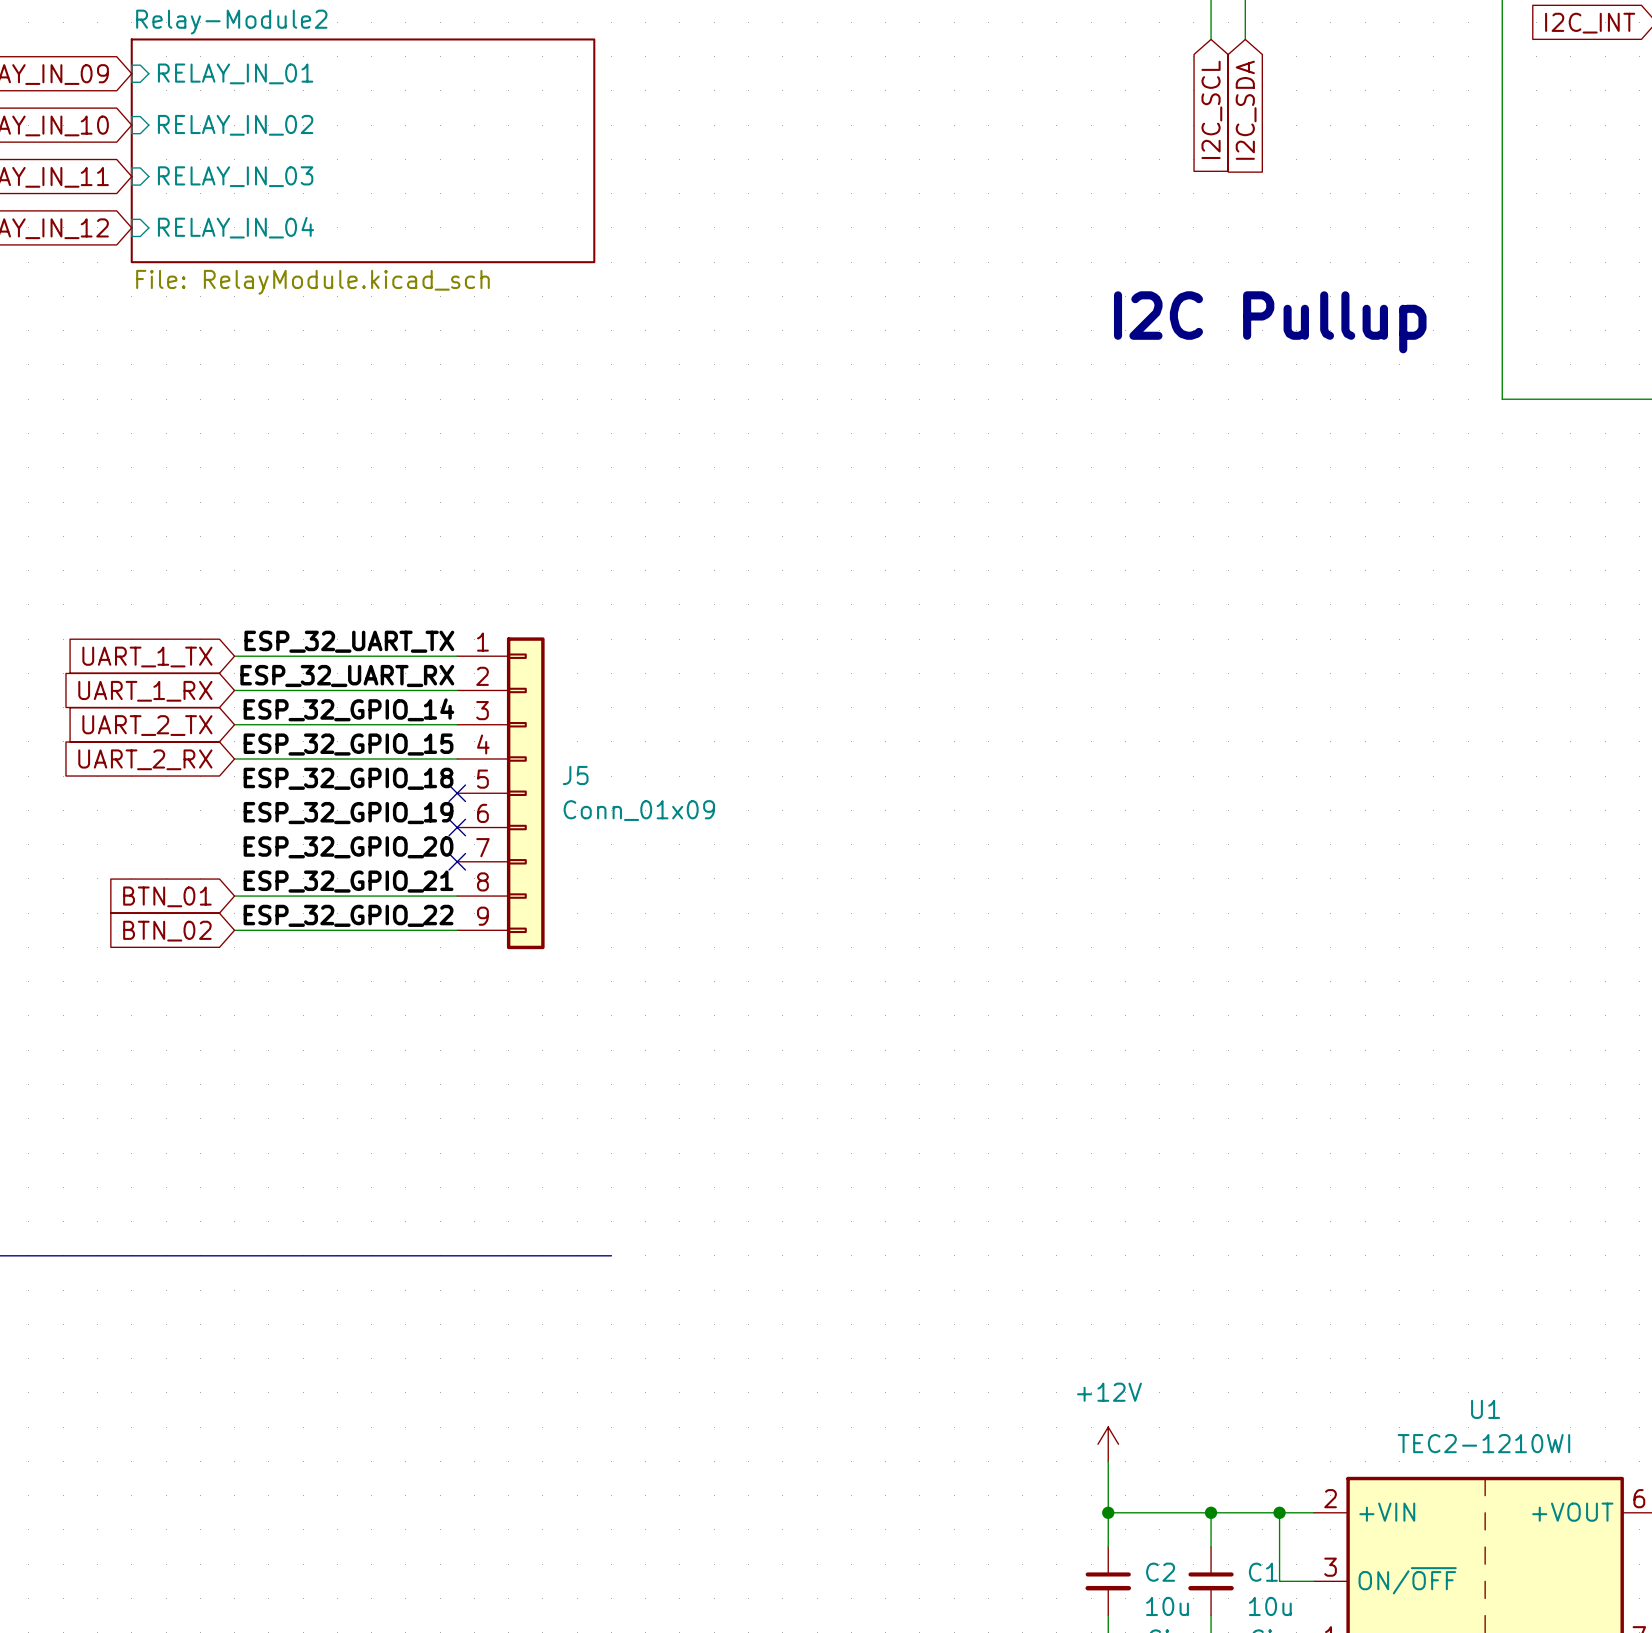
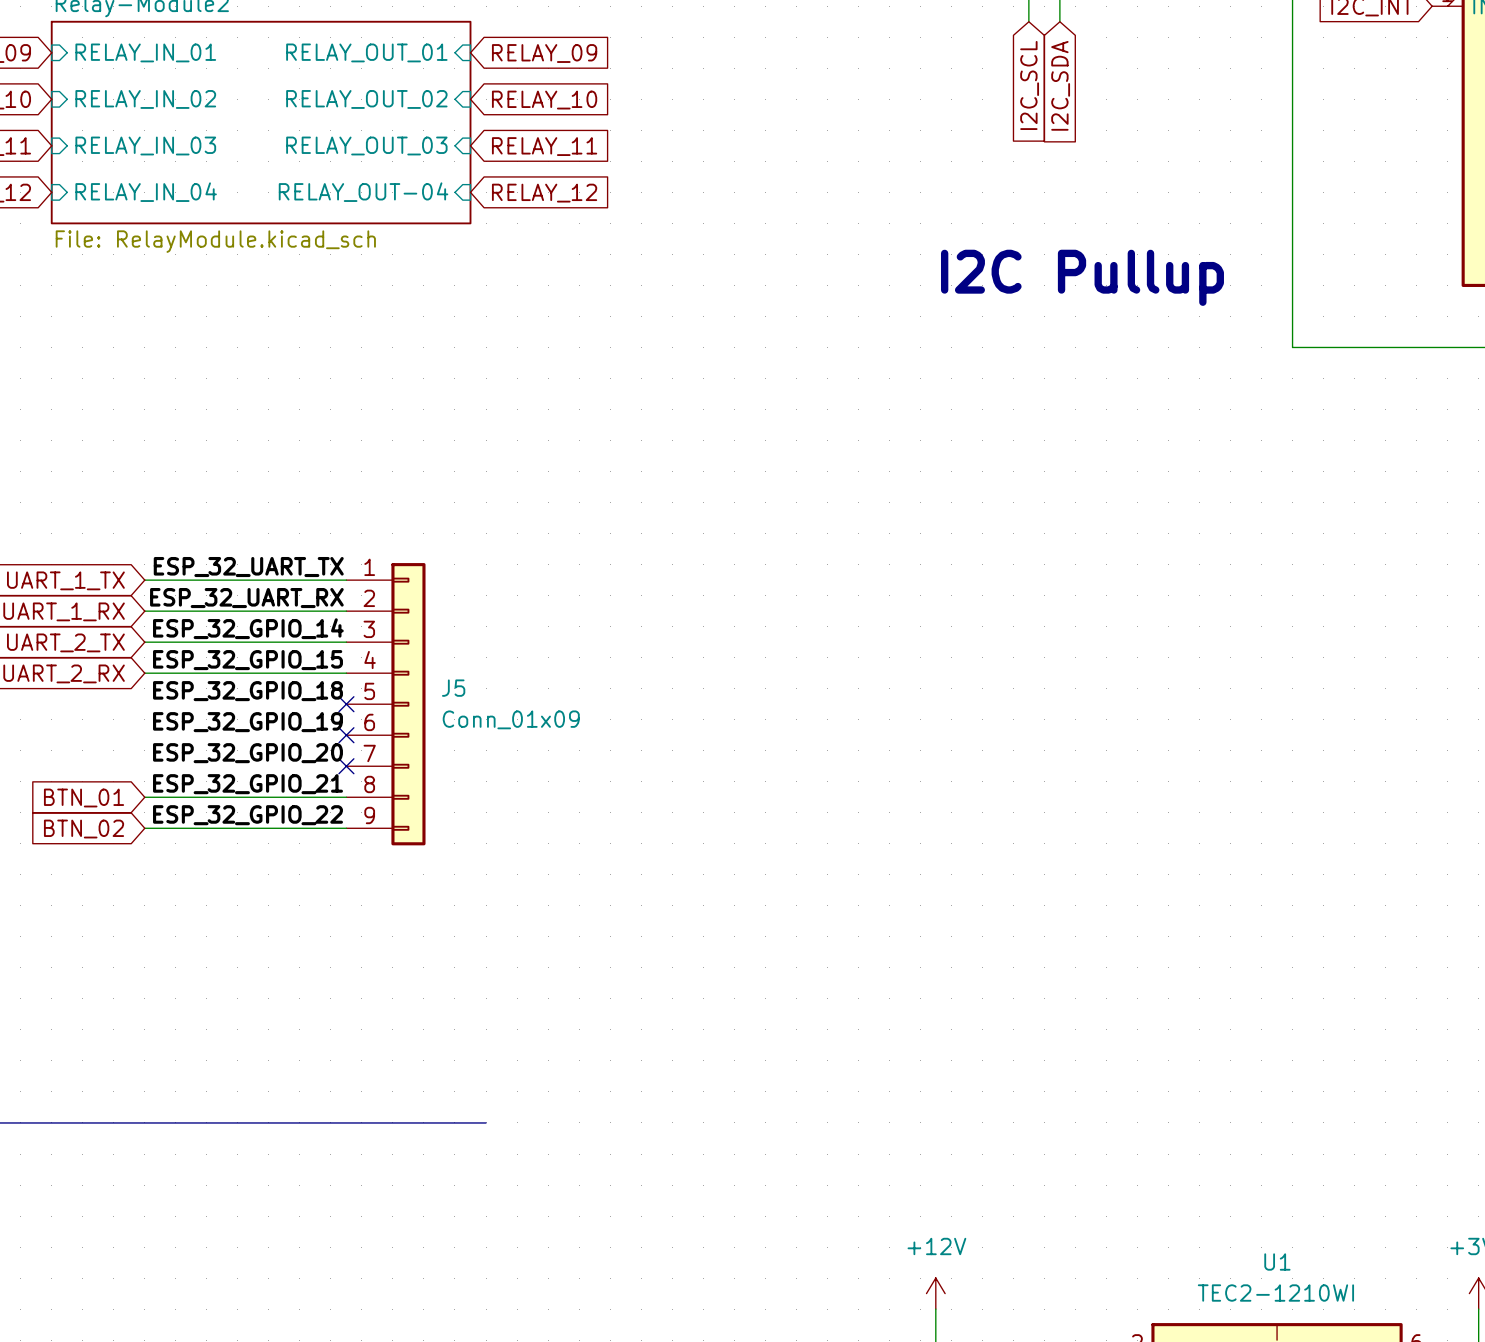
sheet pin: none -> RELAY_OUT_01 (366, 52)
global label: none -> RELAY_09 (544, 53)
sheet pin: none -> RELAY_OUT_02 (366, 99)
global label: none -> RELAY_10 (544, 100)
sheet pin: none -> RELAY_OUT_03 (366, 145)
global label: none -> RELAY_11 (544, 146)
sheet pin: none -> RELAY_OUT-04 (363, 192)
global label: none -> RELAY_12 (544, 193)

